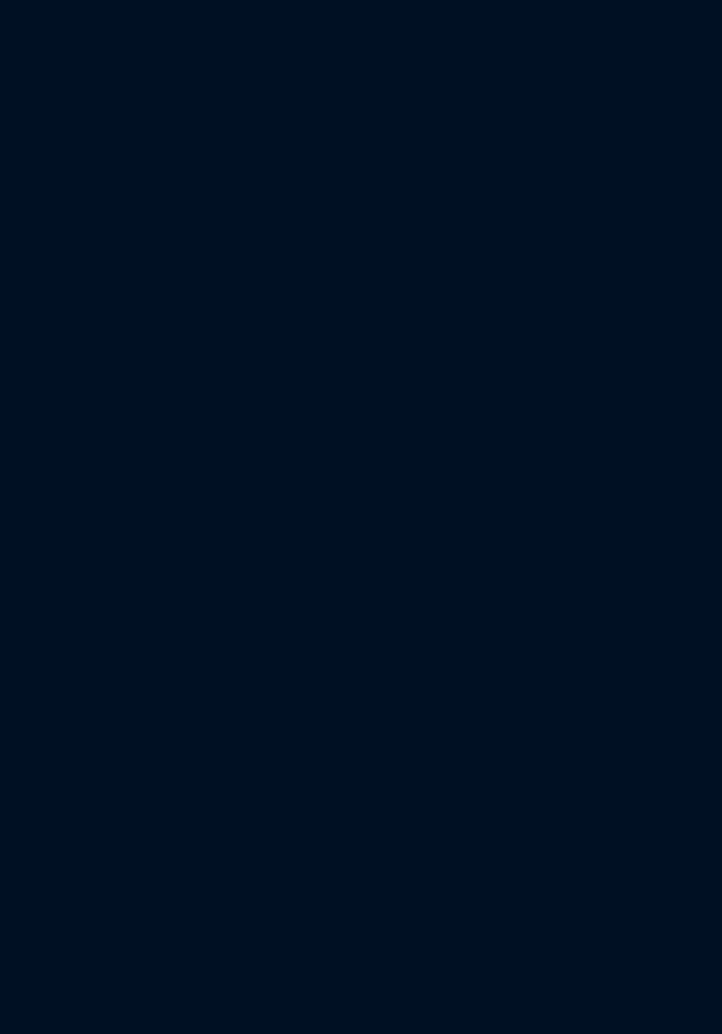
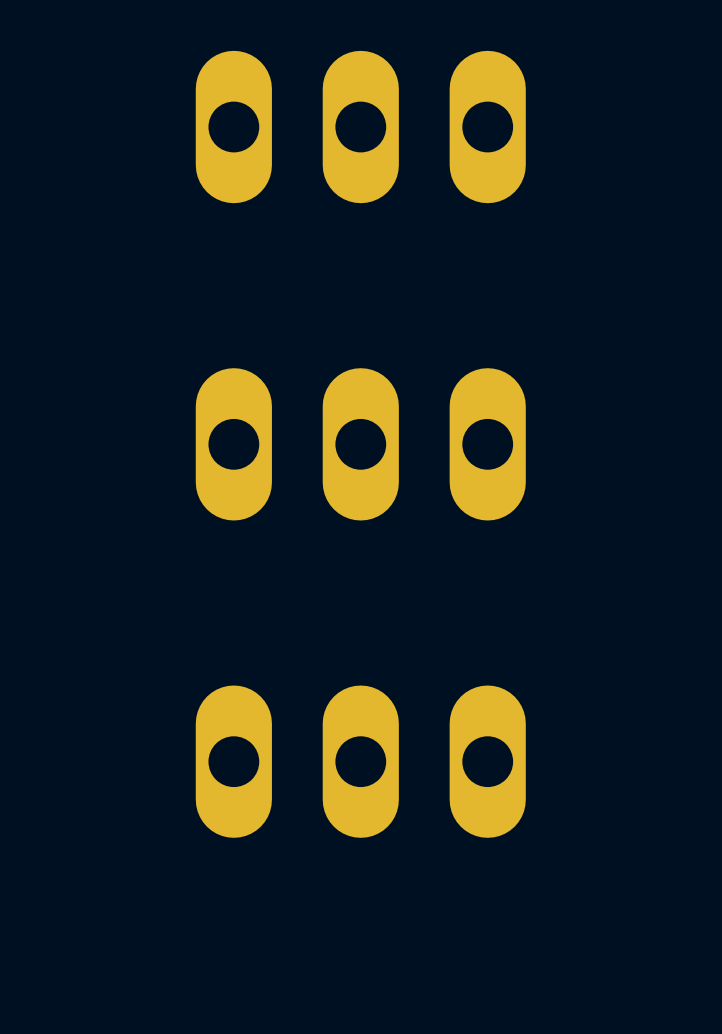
part: none -> (360, 127)
part: none -> (360, 444)
part: none -> (360, 761)

